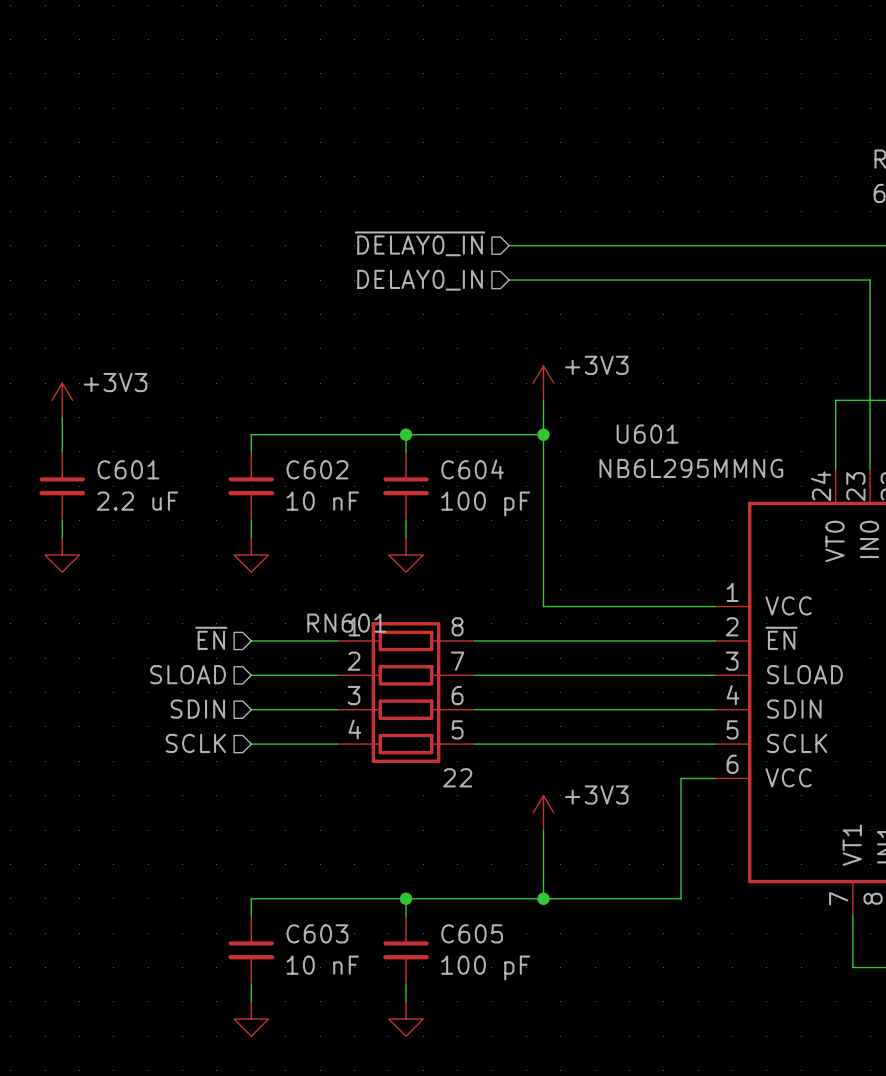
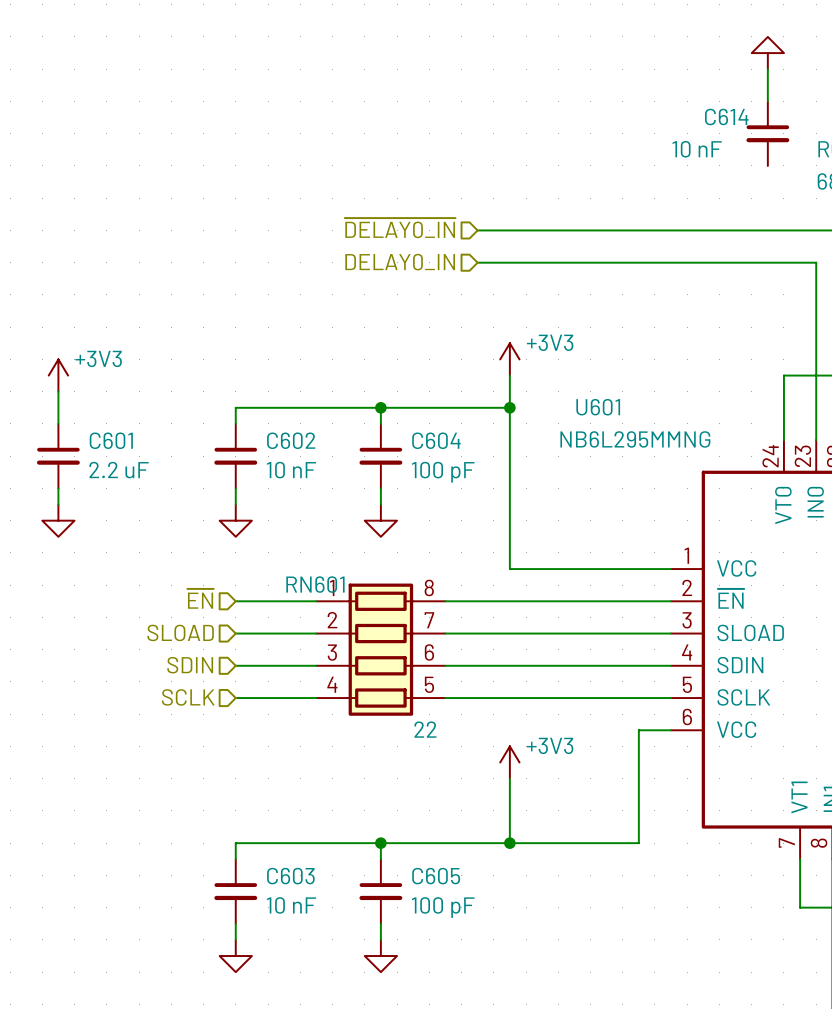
power symbol: none -> (767, 53)
wire: none -> (767, 69) (767, 101)
C614: none -> 10 nF (767, 133)

